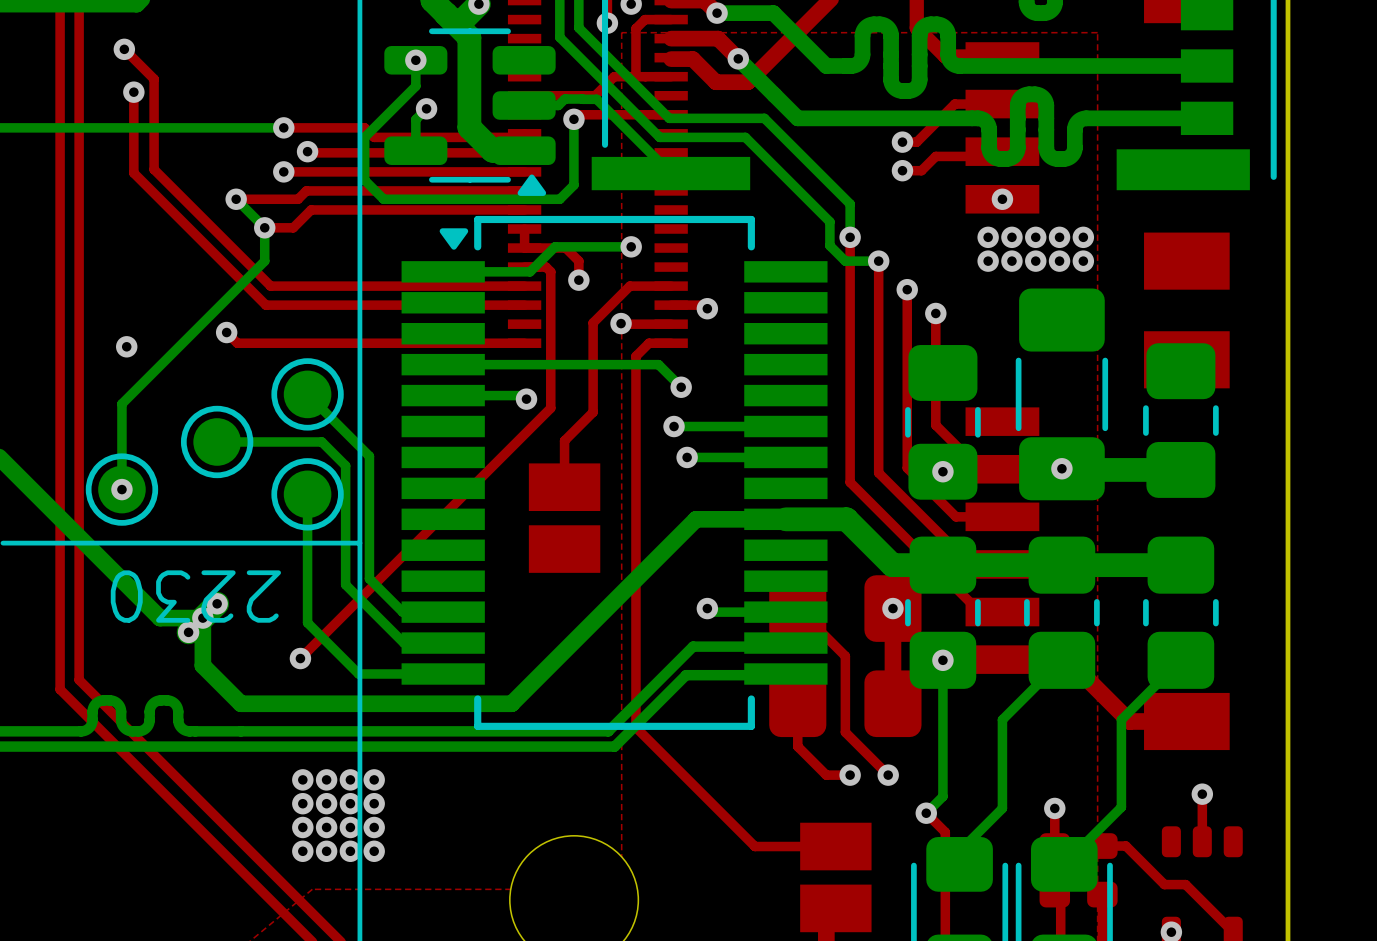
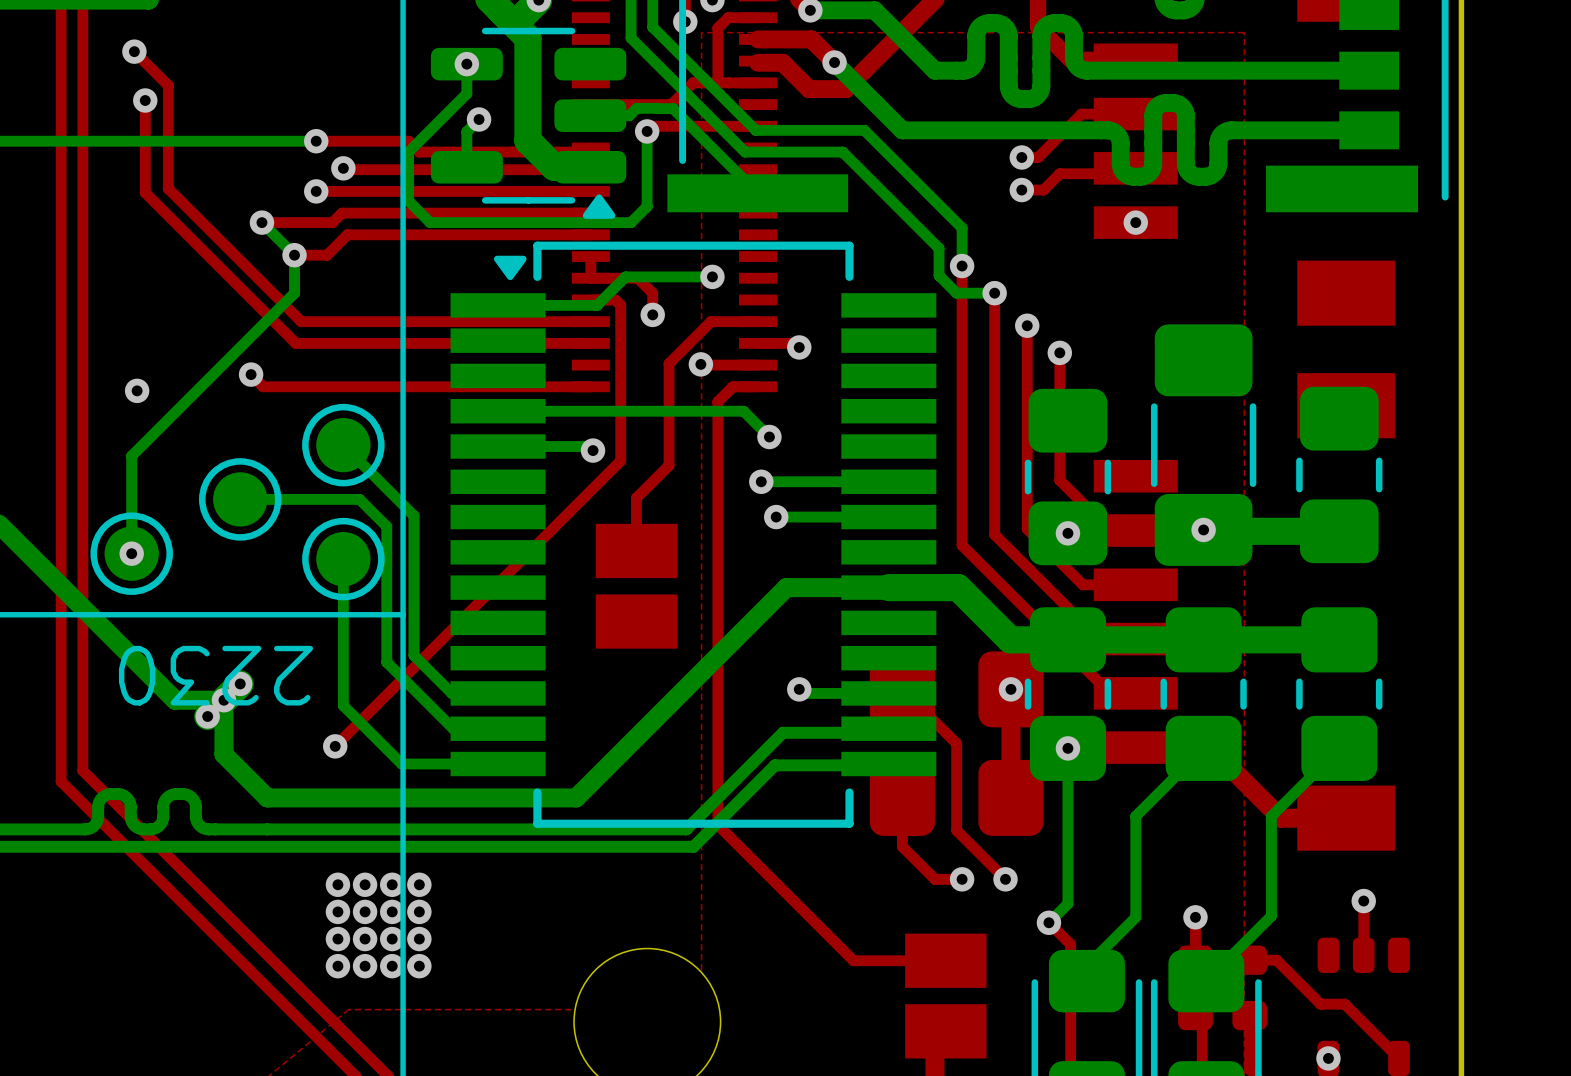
via: (988, 237) -> none
via: (1011, 237) -> none
via: (1035, 237) -> none
via: (1059, 237) -> none
via: (1083, 237) -> none
via: (988, 261) -> none
via: (1011, 261) -> none
via: (1035, 261) -> none
via: (1059, 261) -> none
via: (1083, 261) -> none

